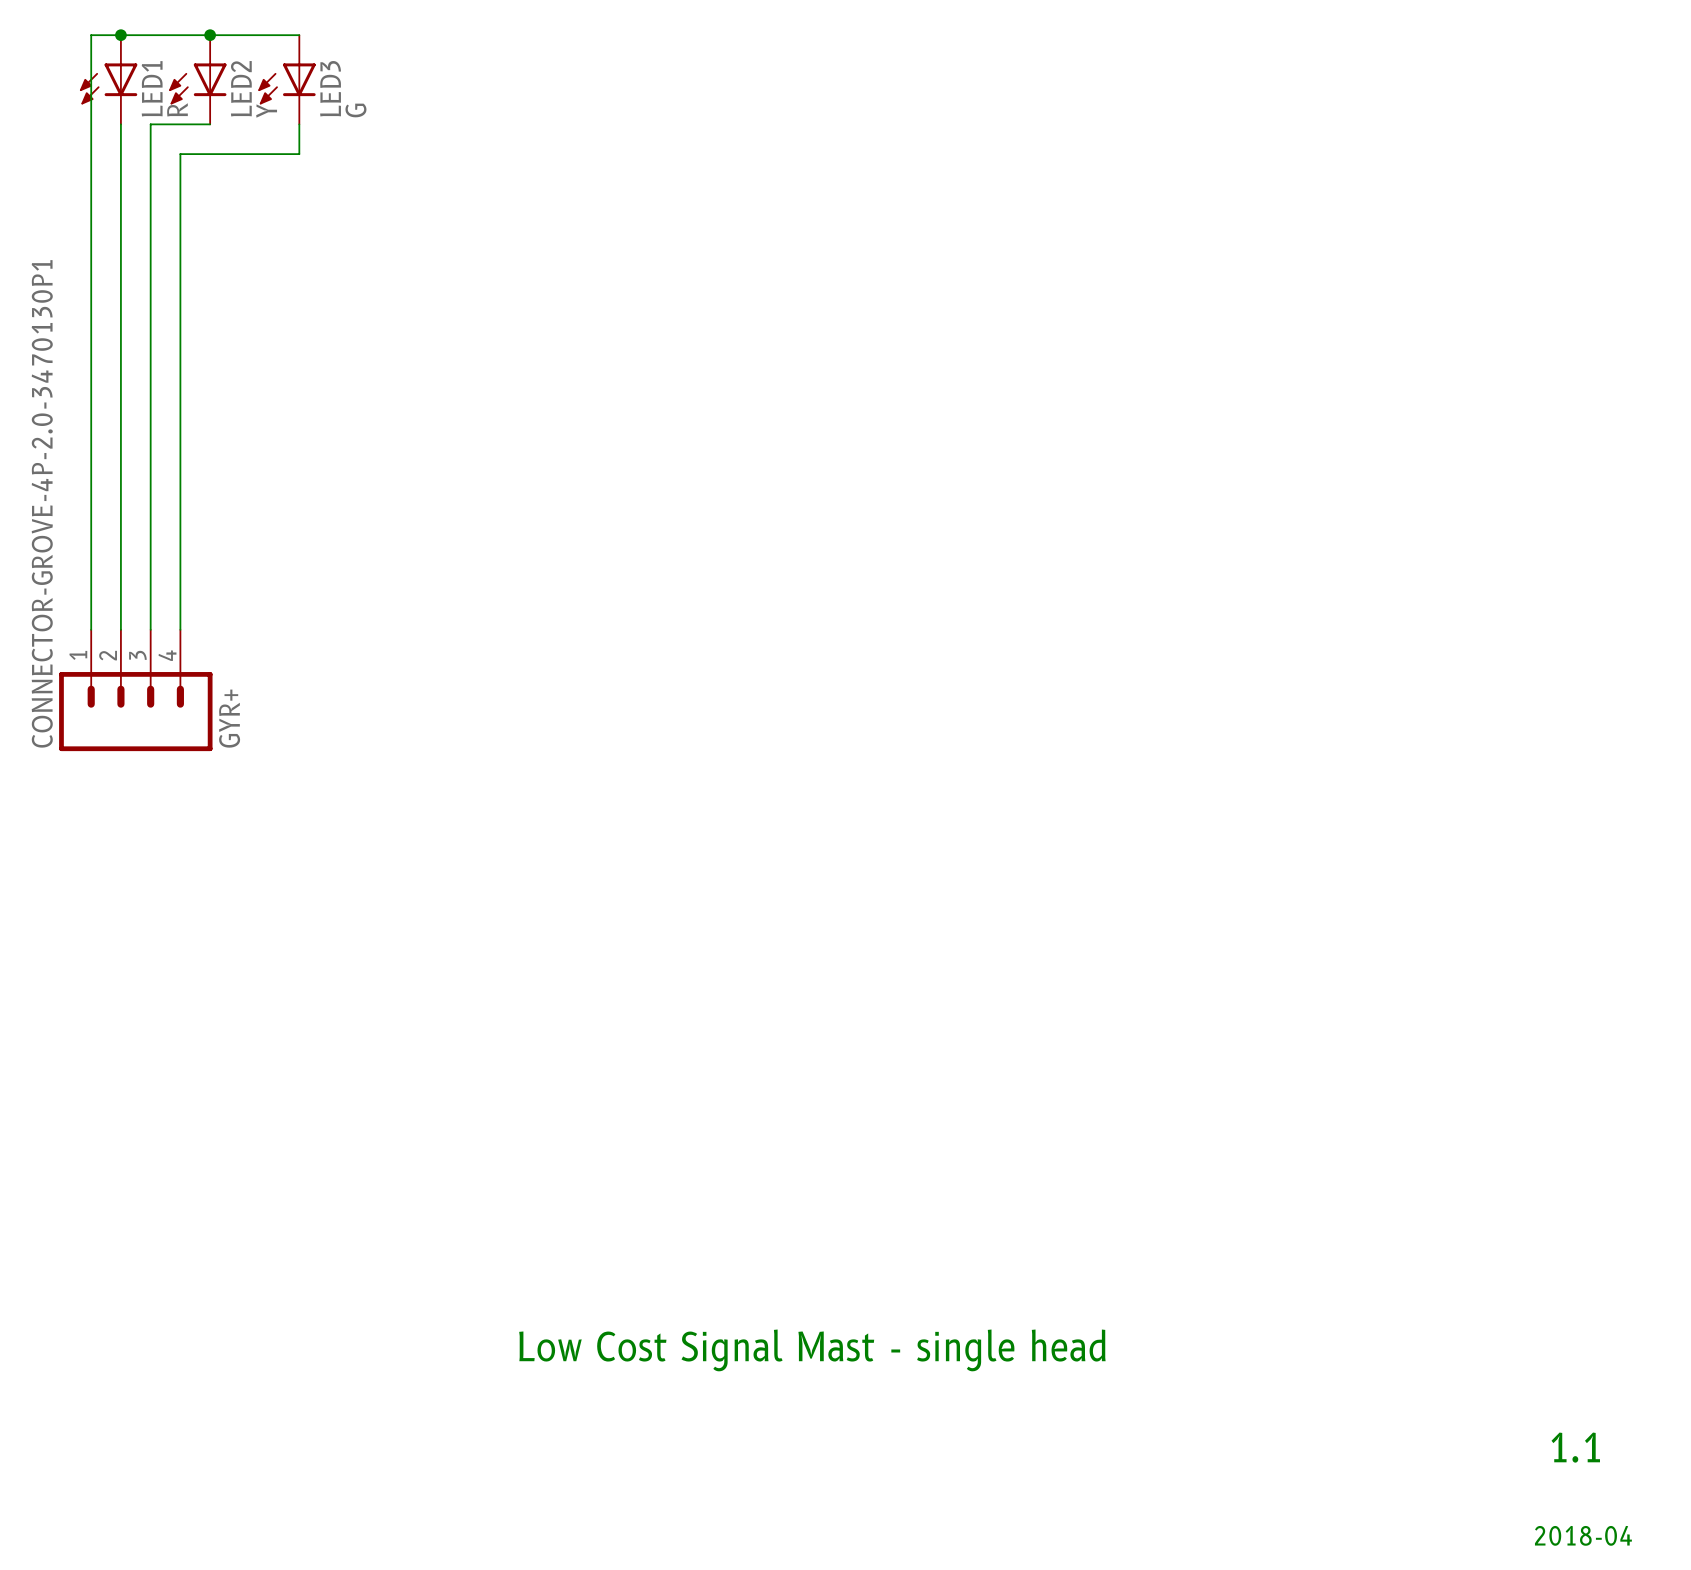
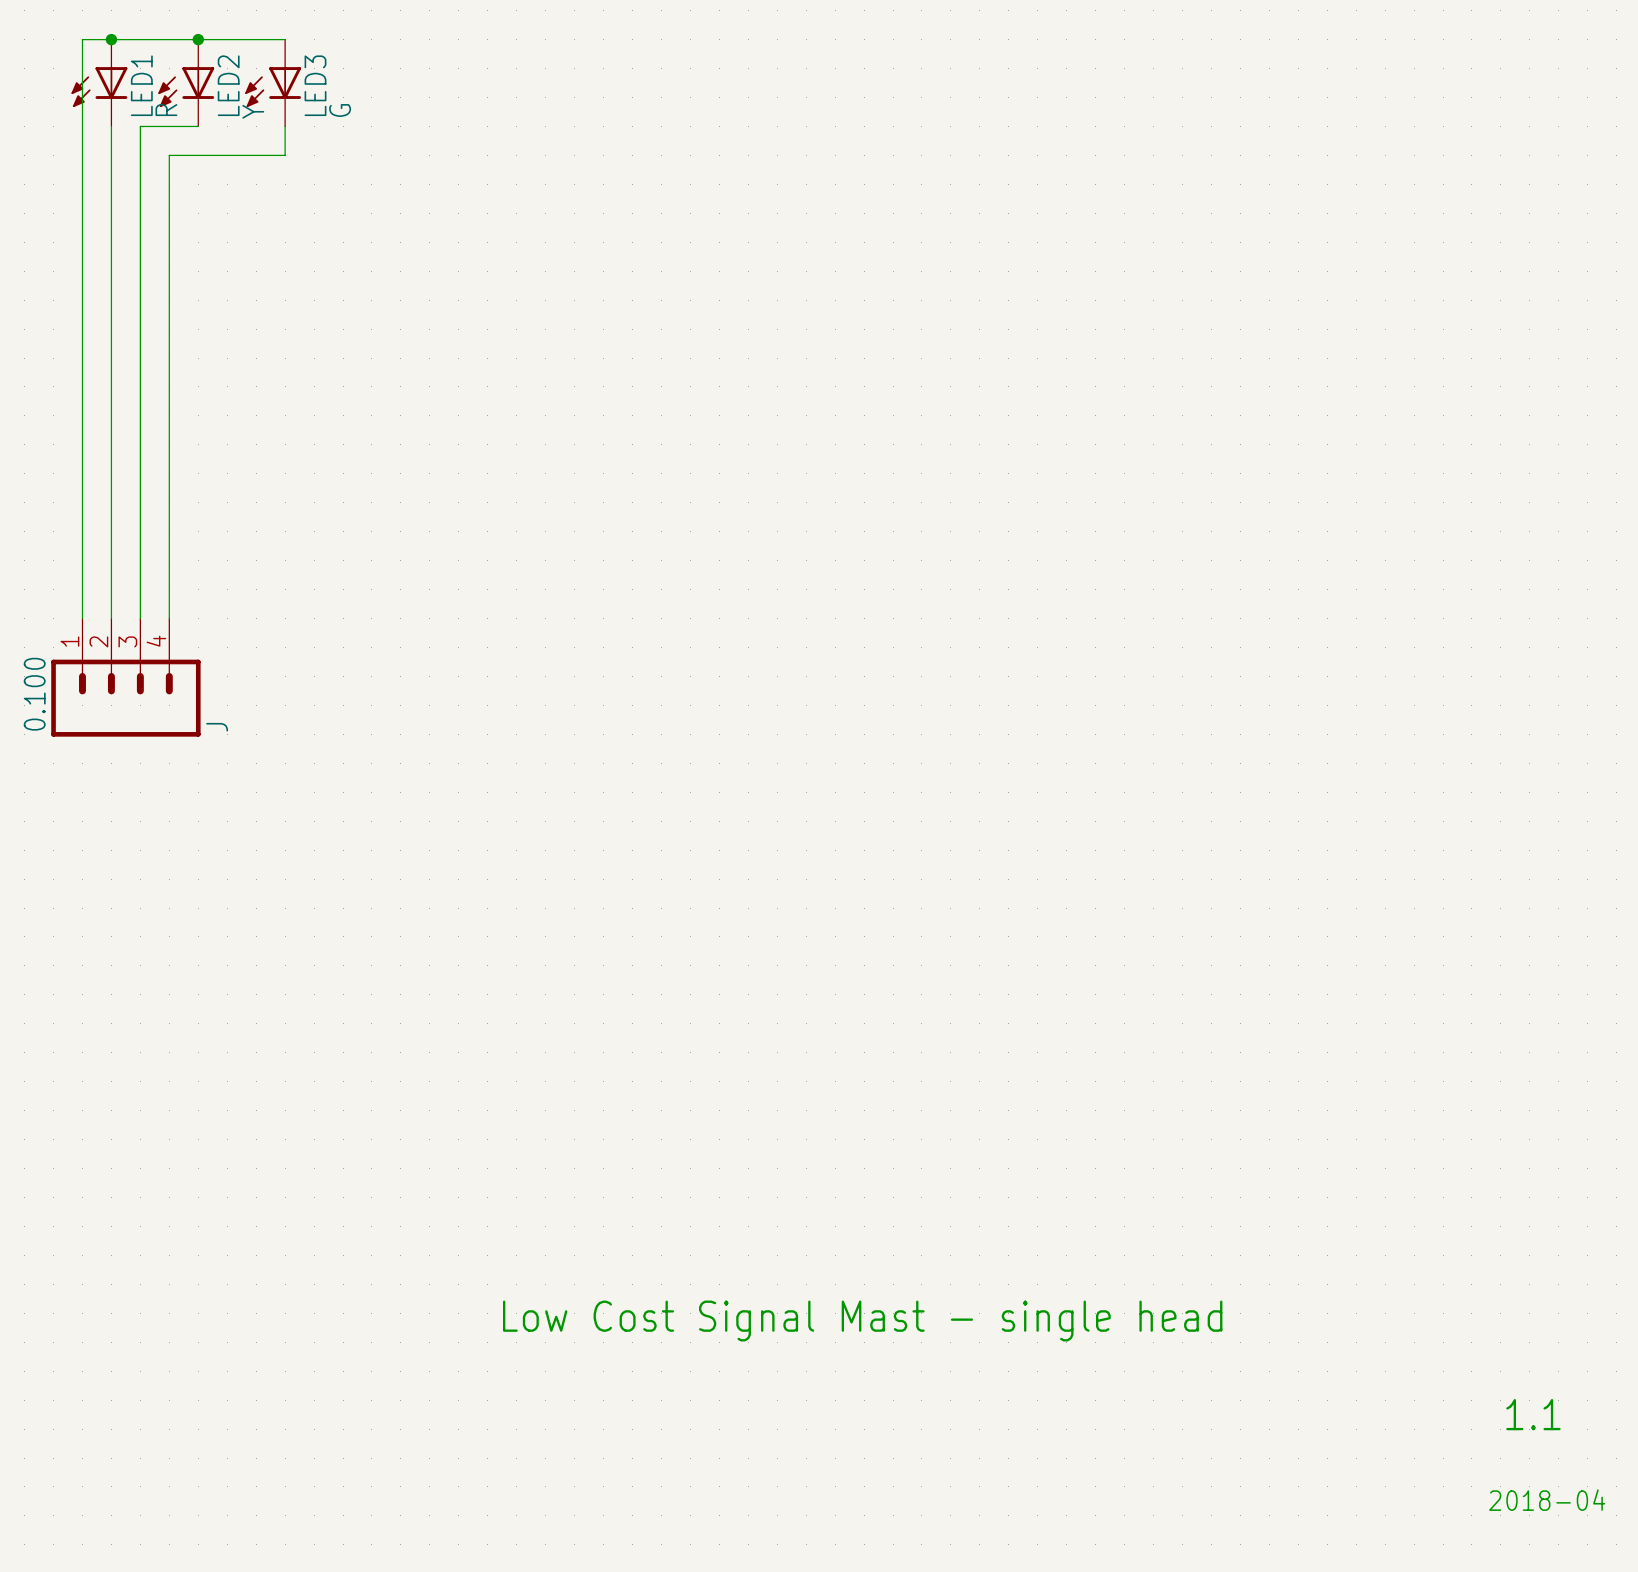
GYR+ value: CONNECTOR-GROVE-4P-2.0-3470130P1 (42, 503) -> 0.100 (34, 694)
GYR+ name: GYR+ (229, 718) -> J (217, 727)

